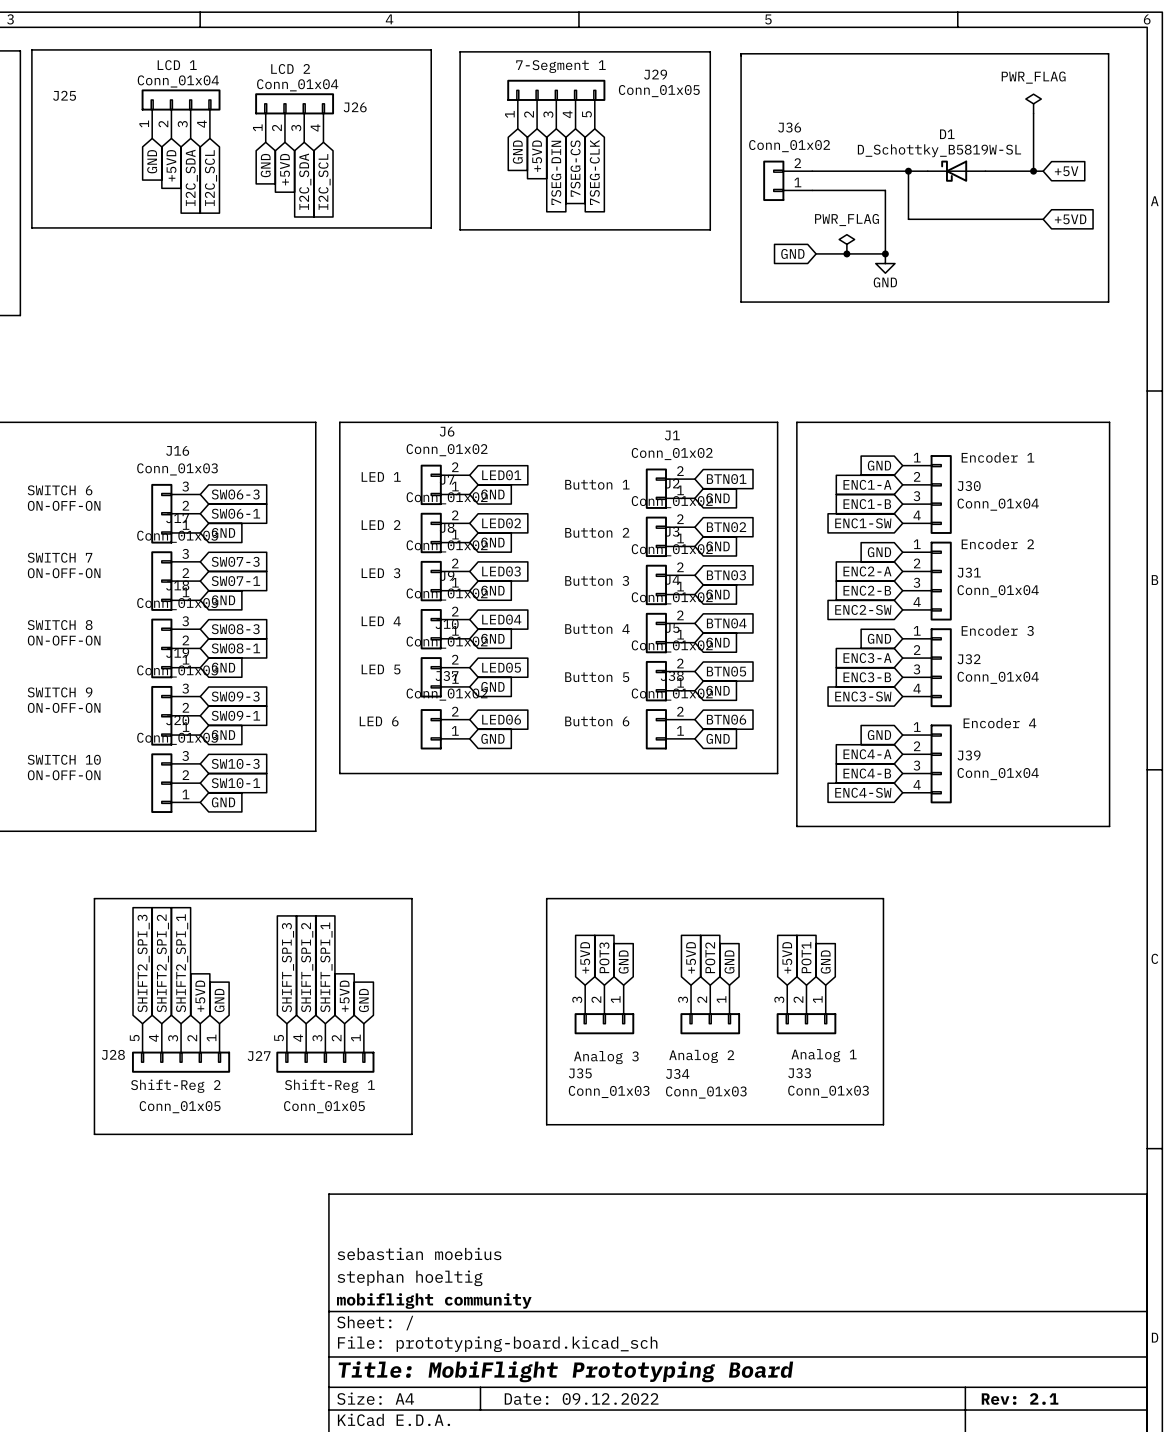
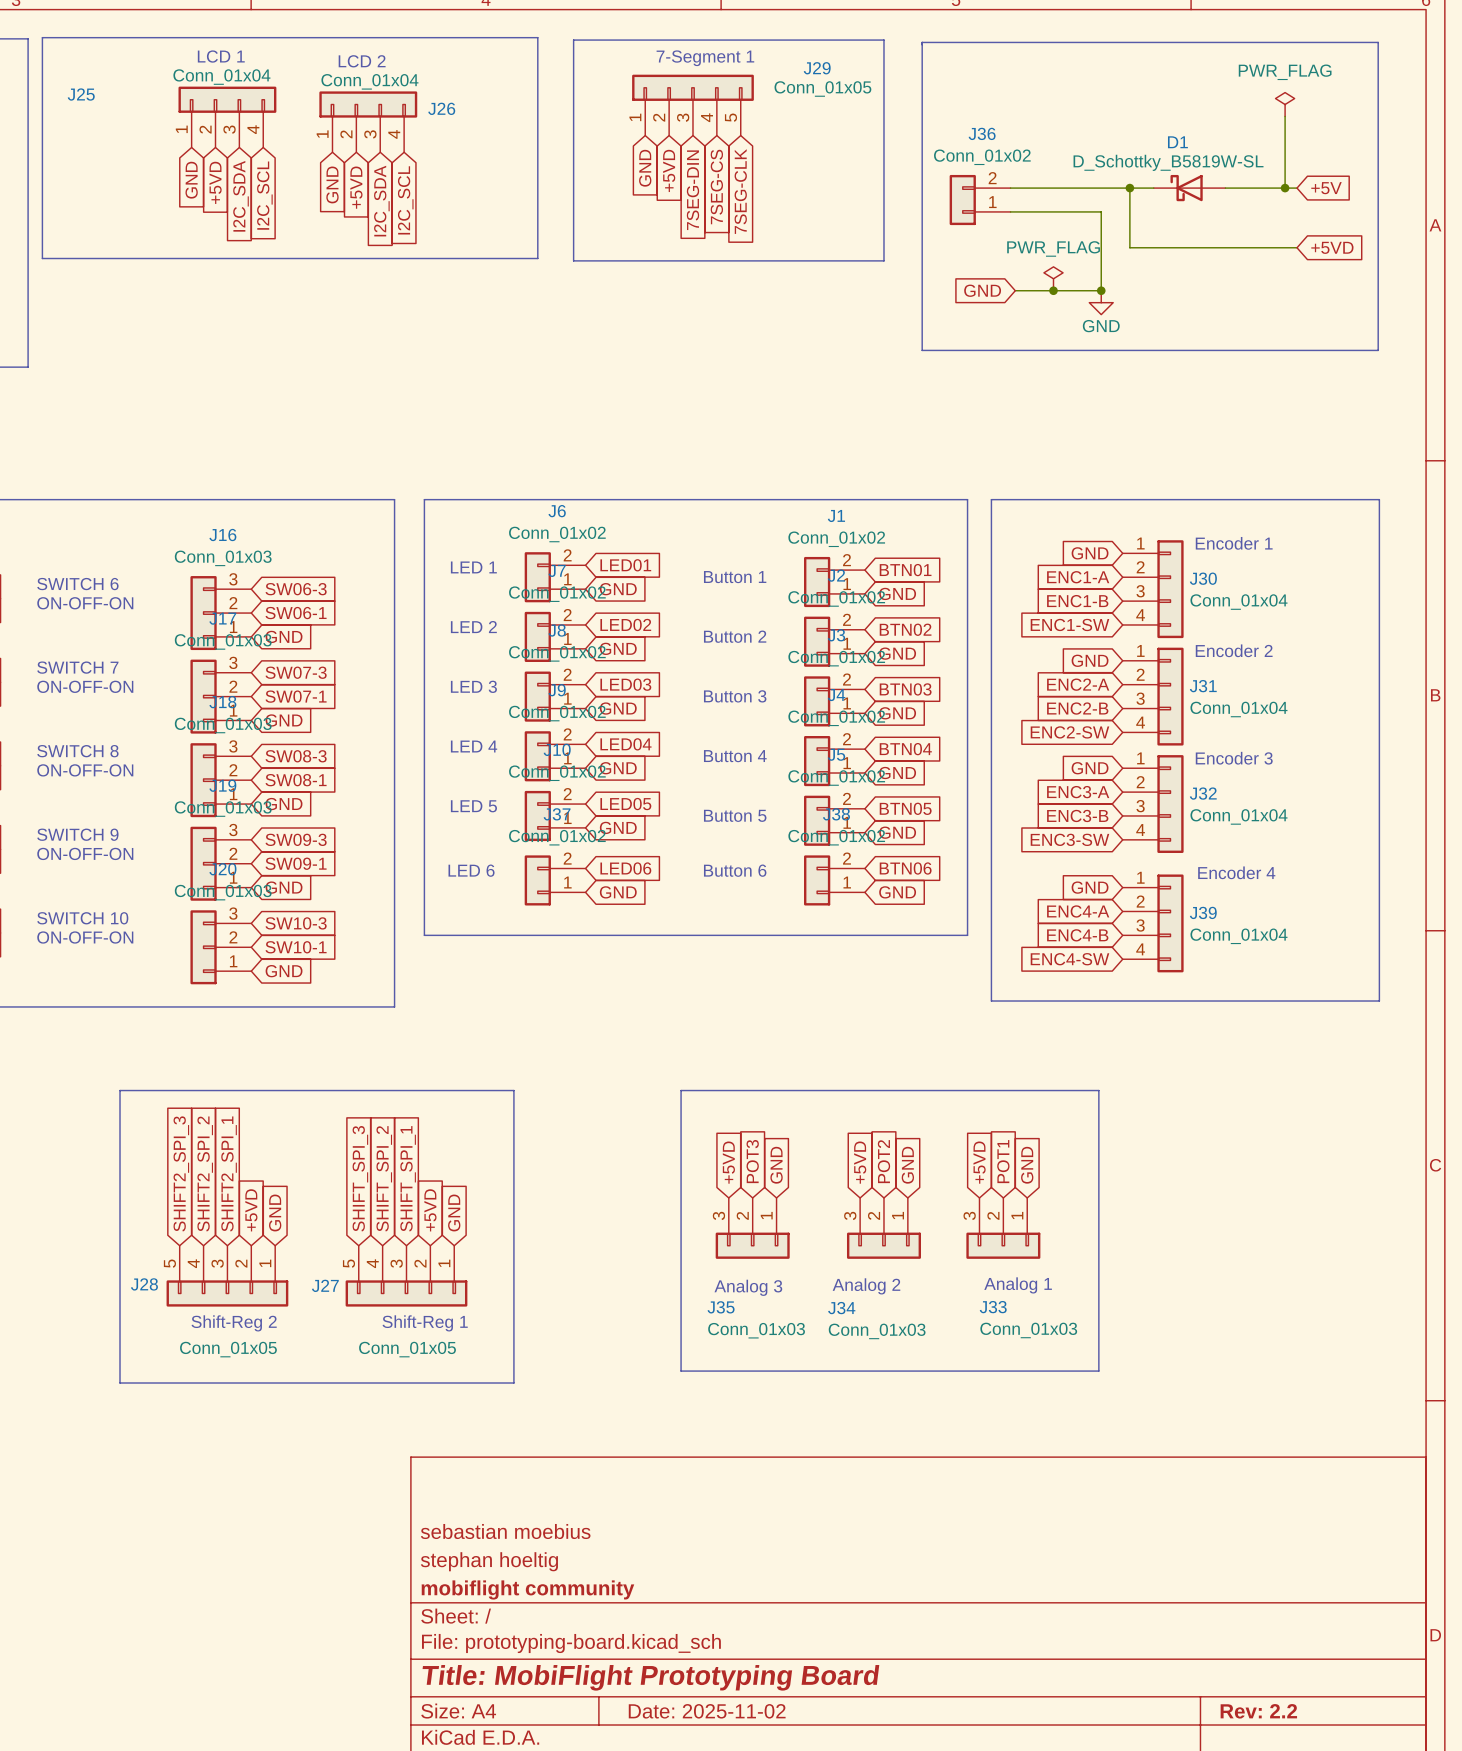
title block: Date: 09.12.2022 (581, 1398) -> Date: 2025-11-02 (707, 1711)
title block: Rev: 2.1 (1020, 1398) -> Rev: 2.2 (1258, 1711)

